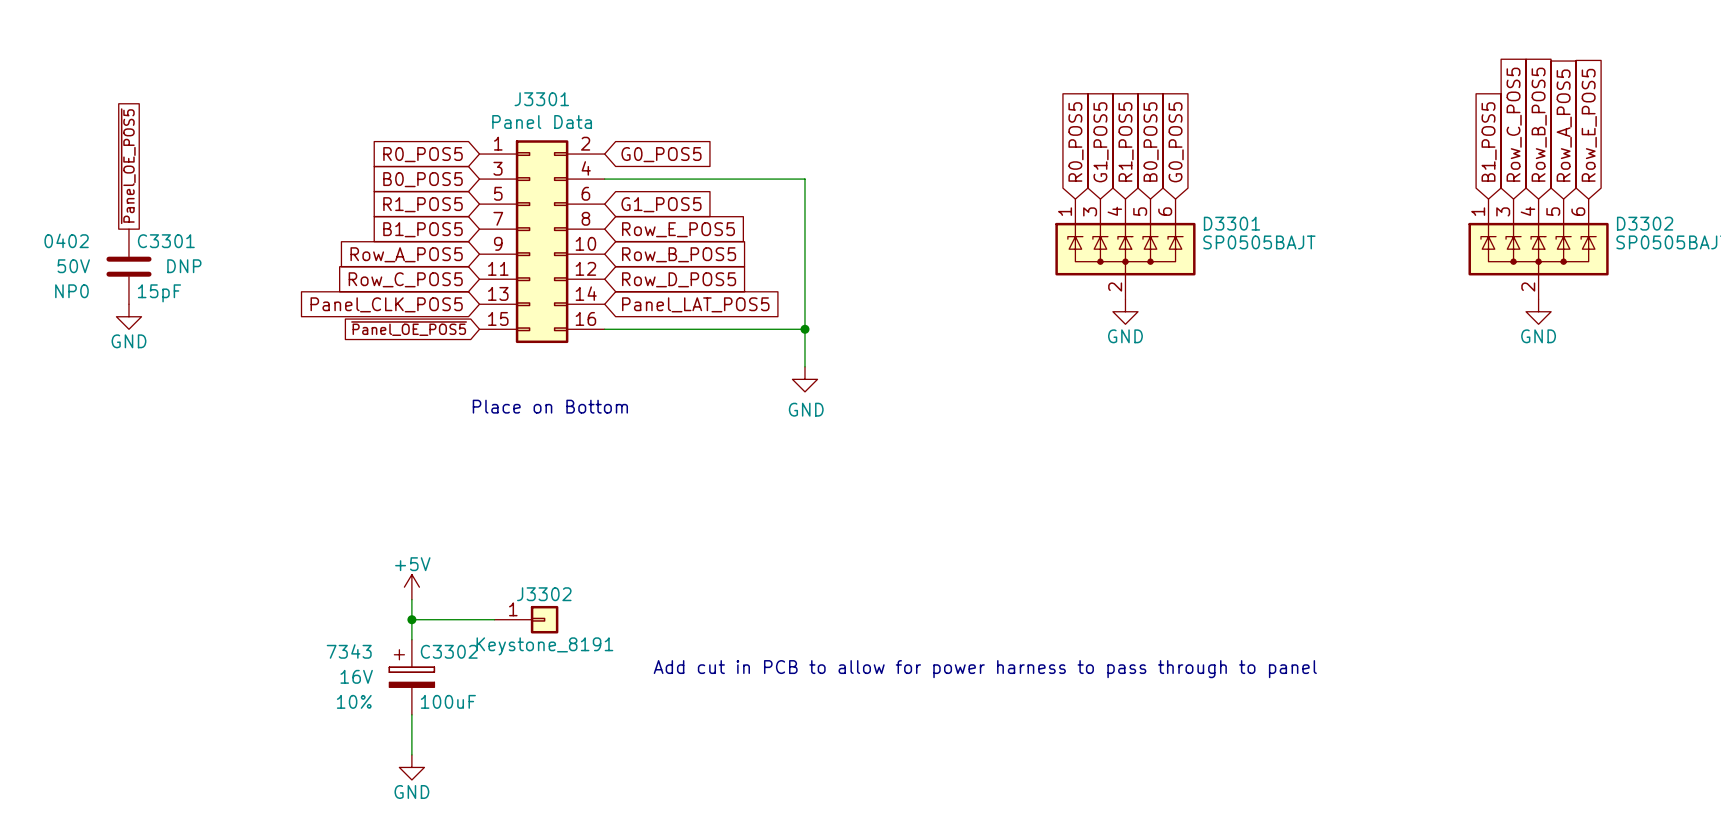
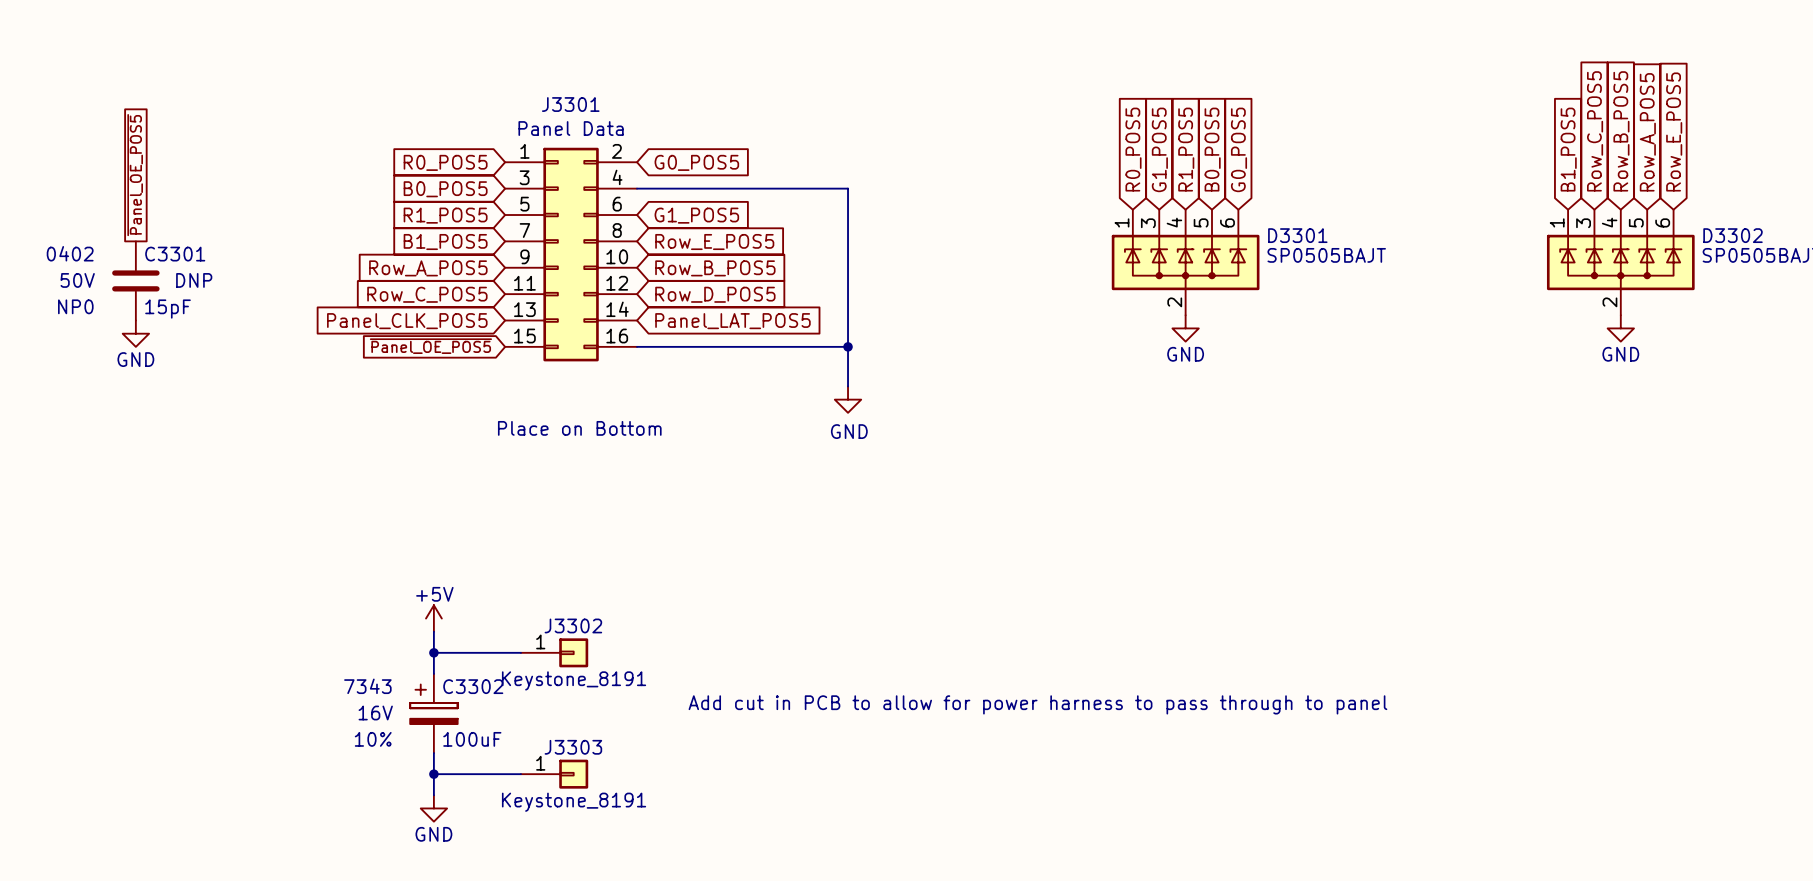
wire: none -> (433, 774) (520, 774)
junction: none -> (433, 774)
J3303: none -> Keystone_8191 (554, 774)

